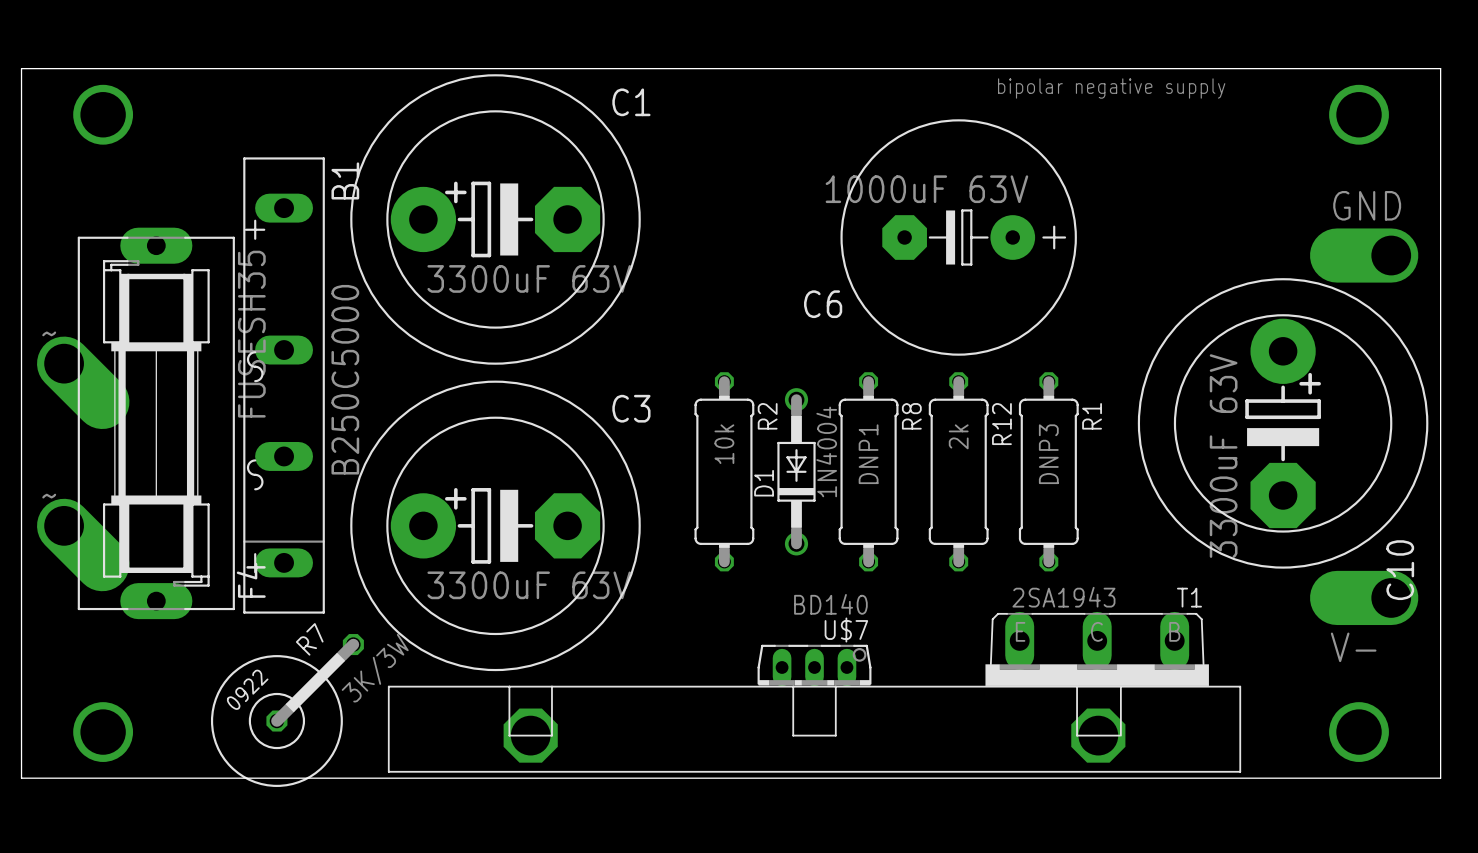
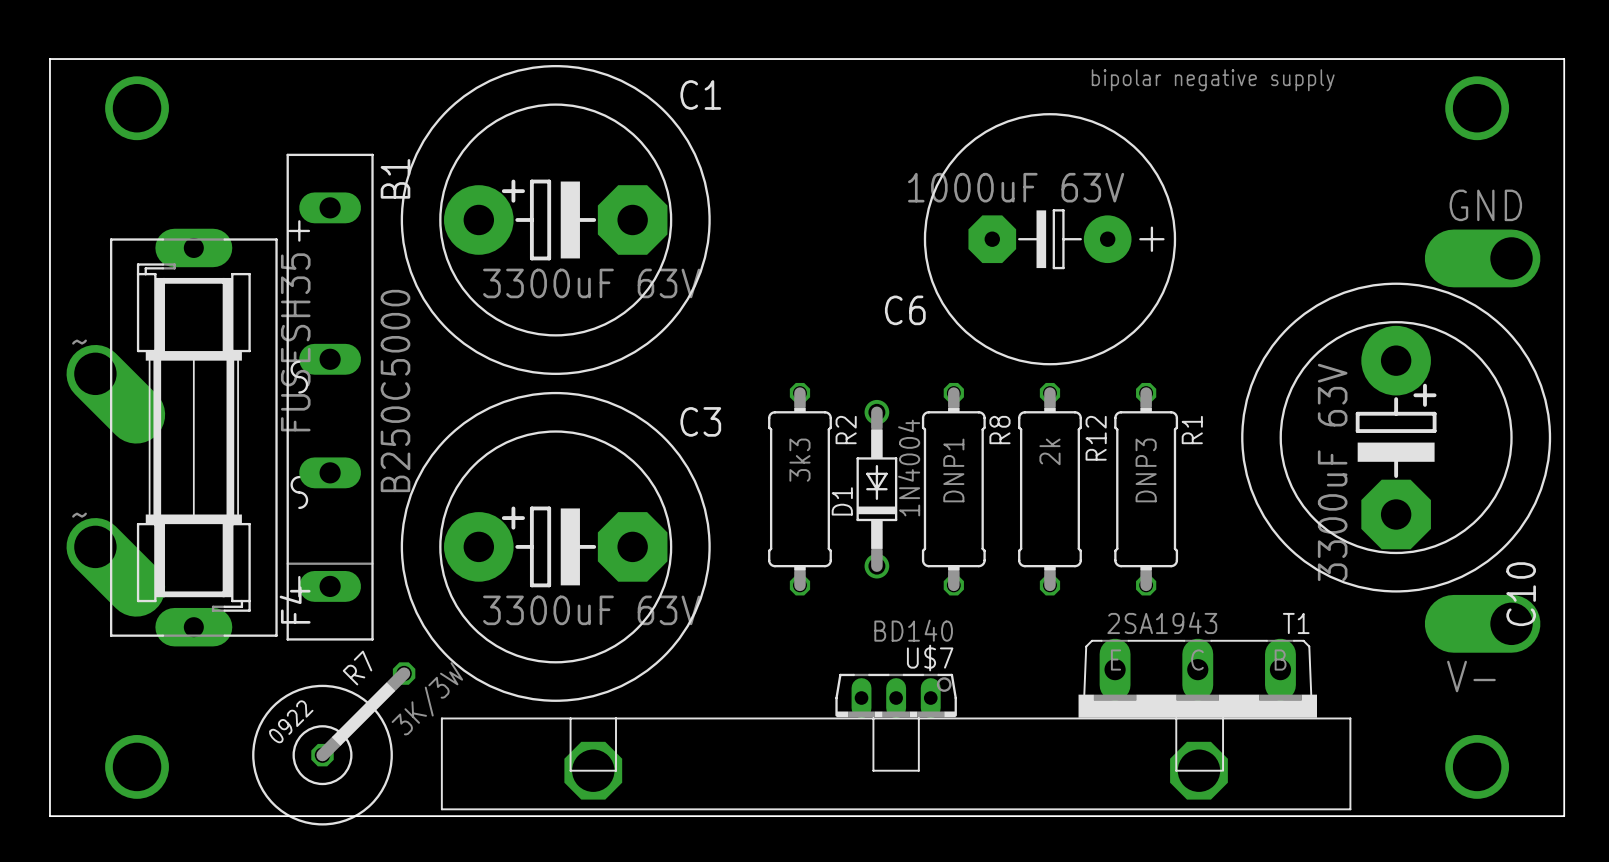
R2 value: 10k (724, 444) -> 3k3 (799, 460)

